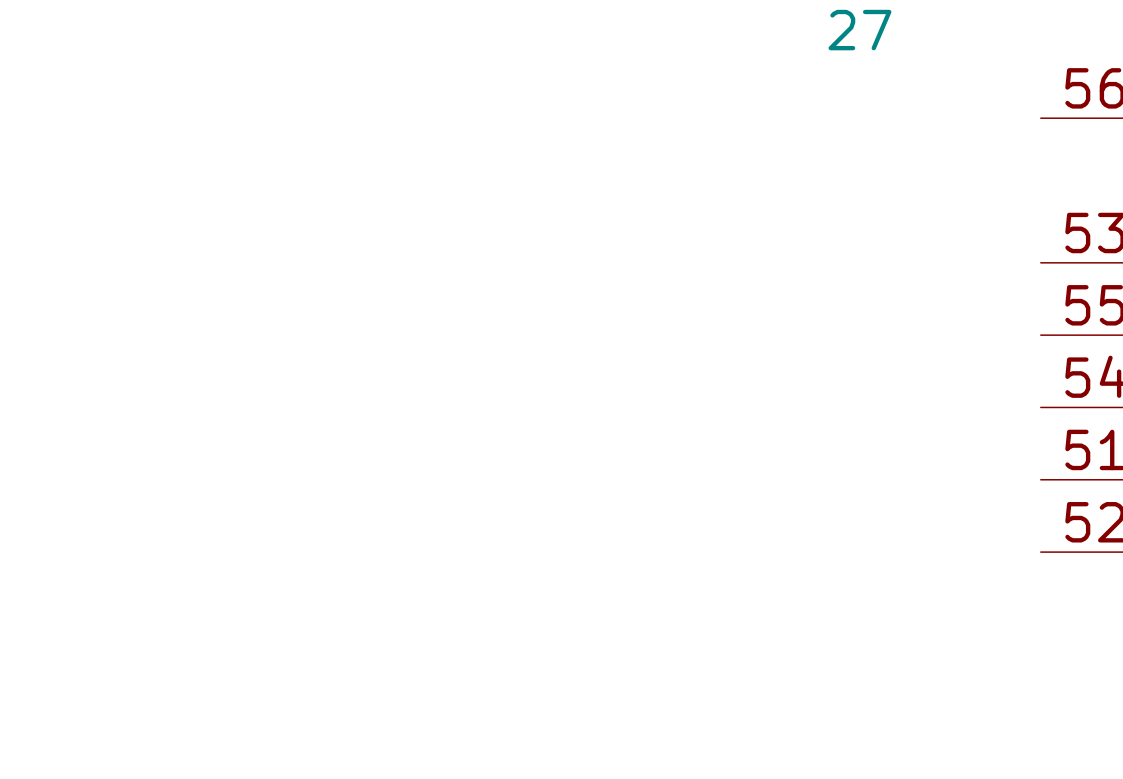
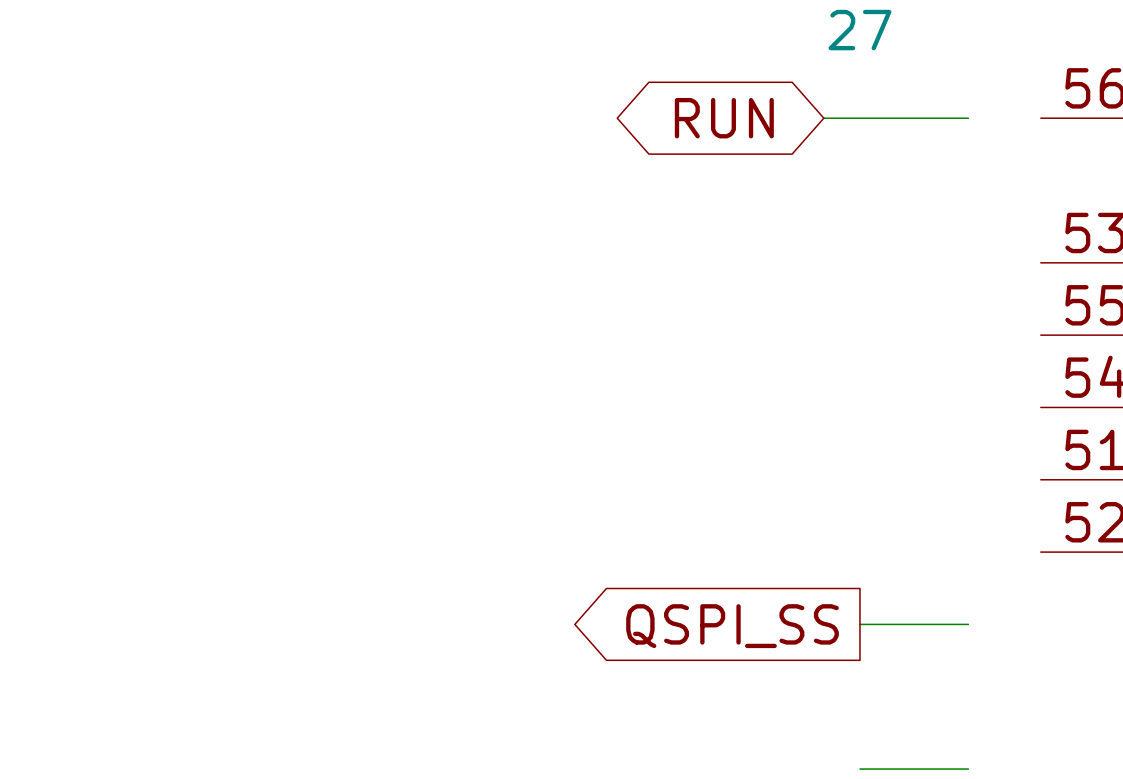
global label: none -> RUN (724, 118)
wire: none -> (823, 118) (968, 118)
wire: none -> (859, 624) (968, 624)
global label: none -> QSPI_SS (732, 626)
wire: none -> (859, 769) (968, 769)

